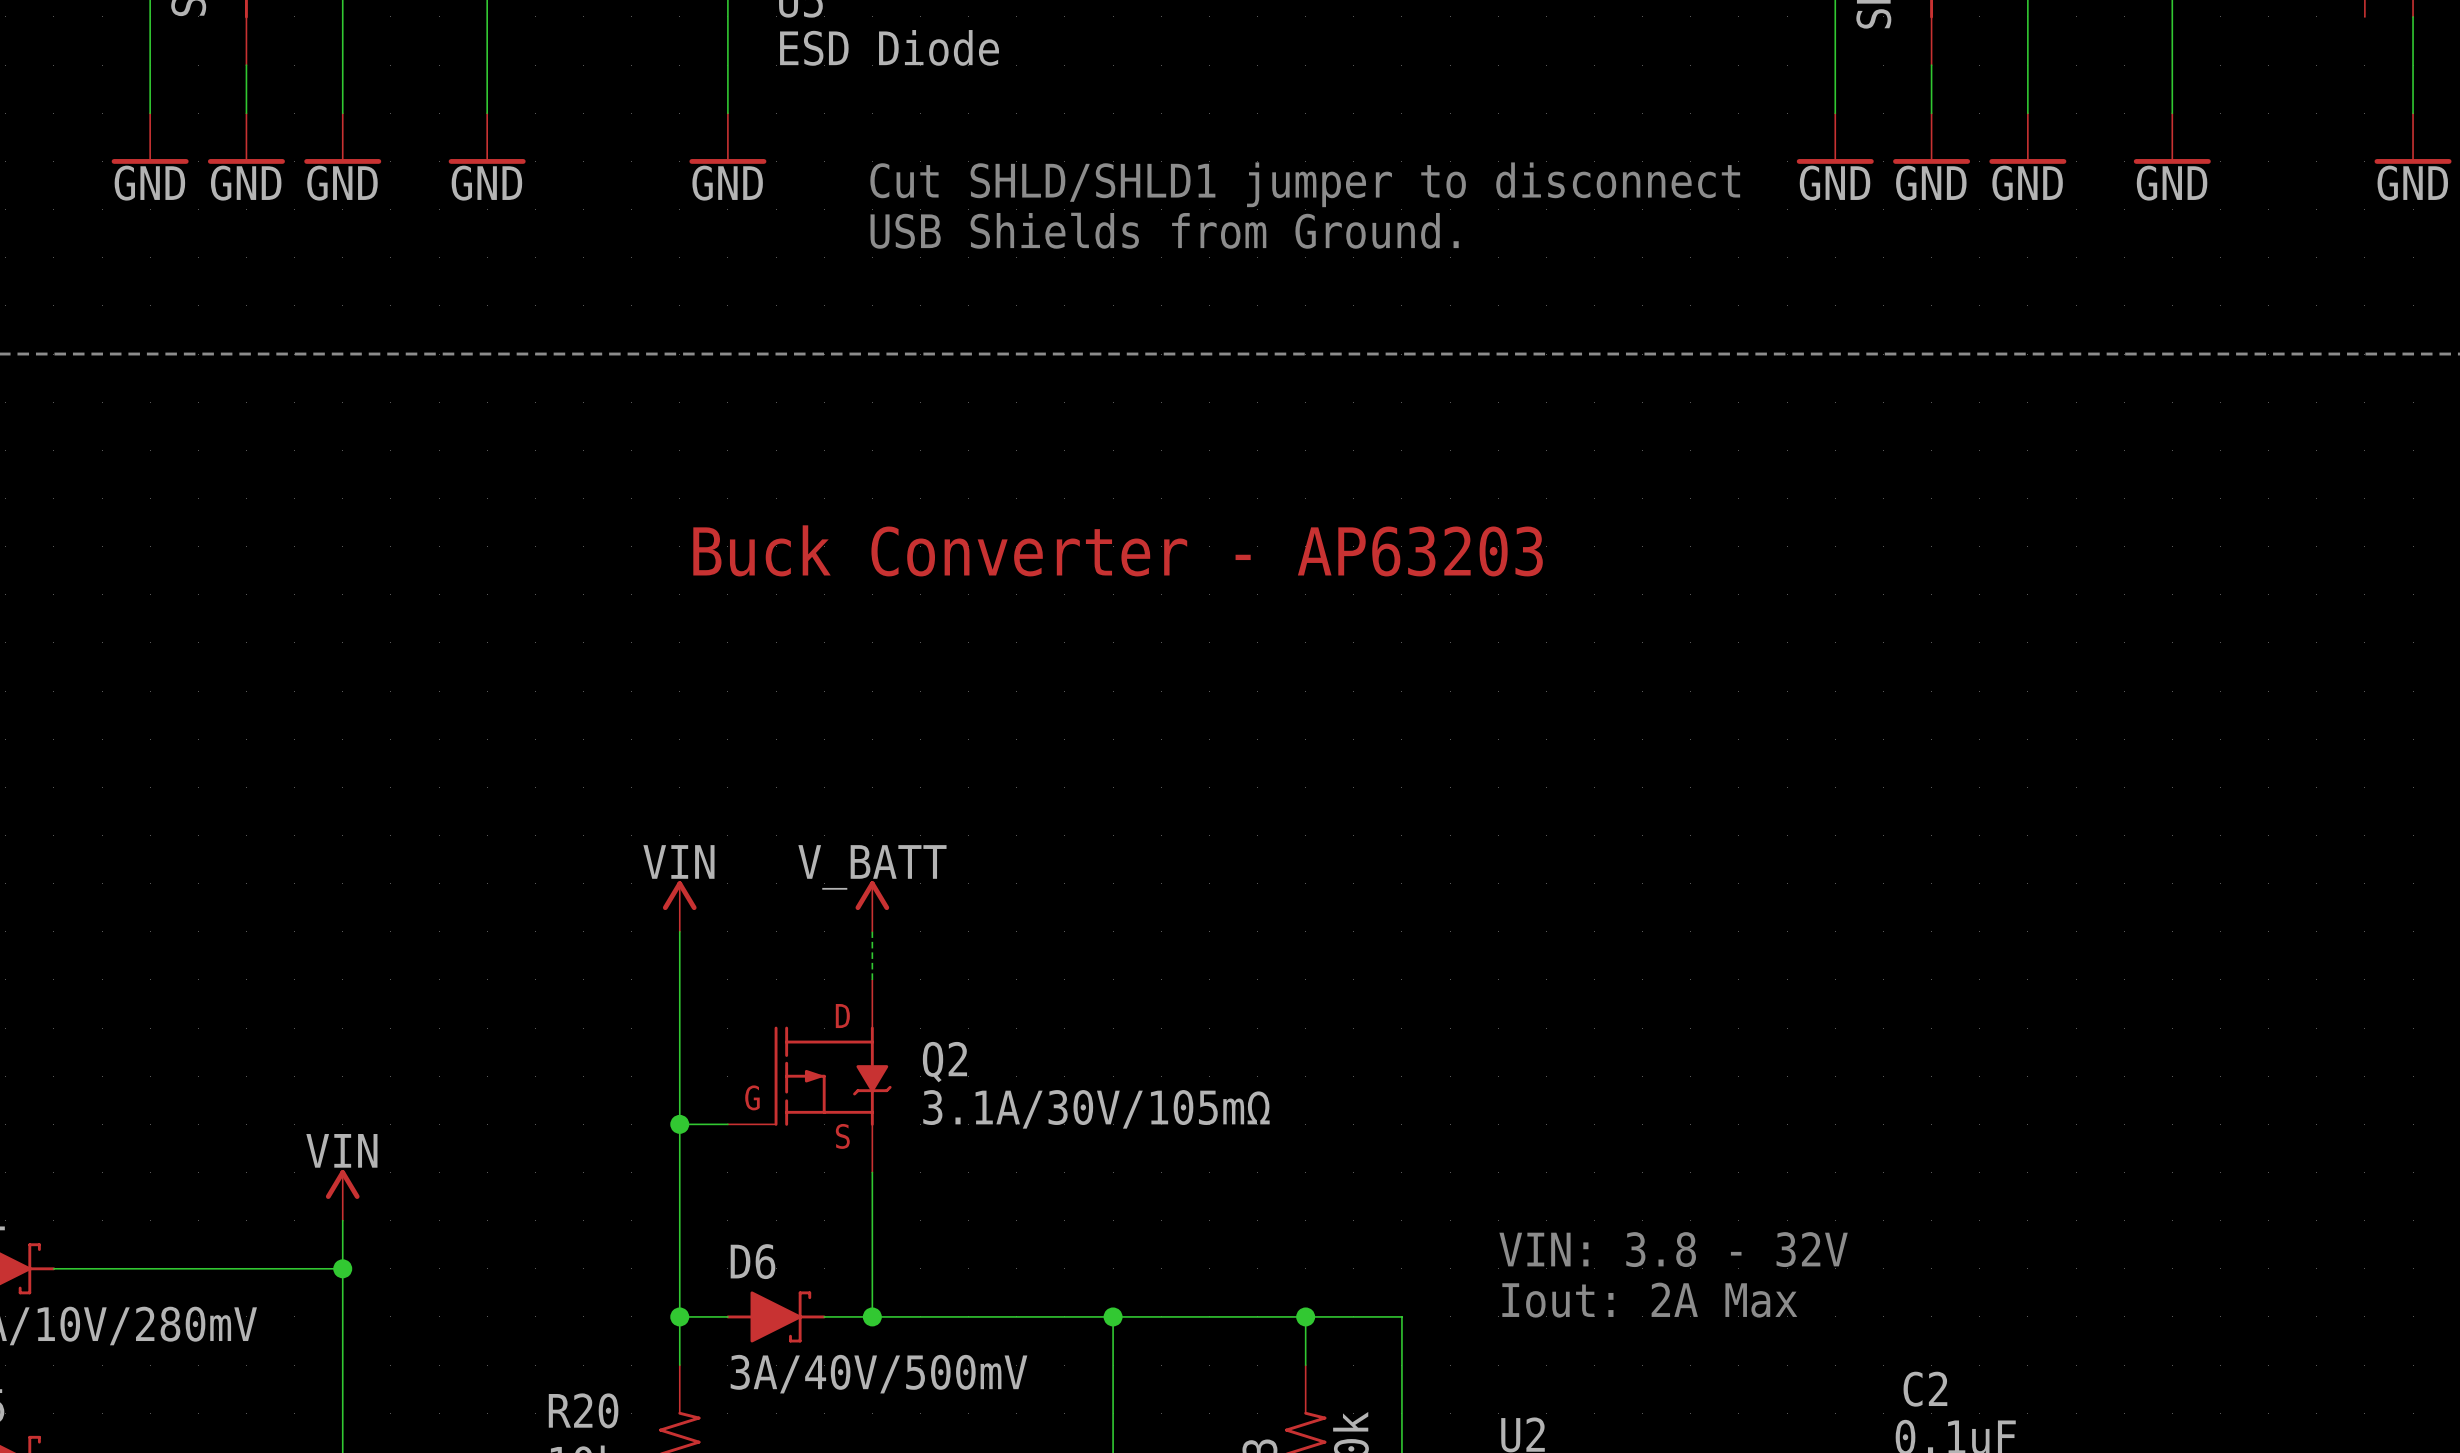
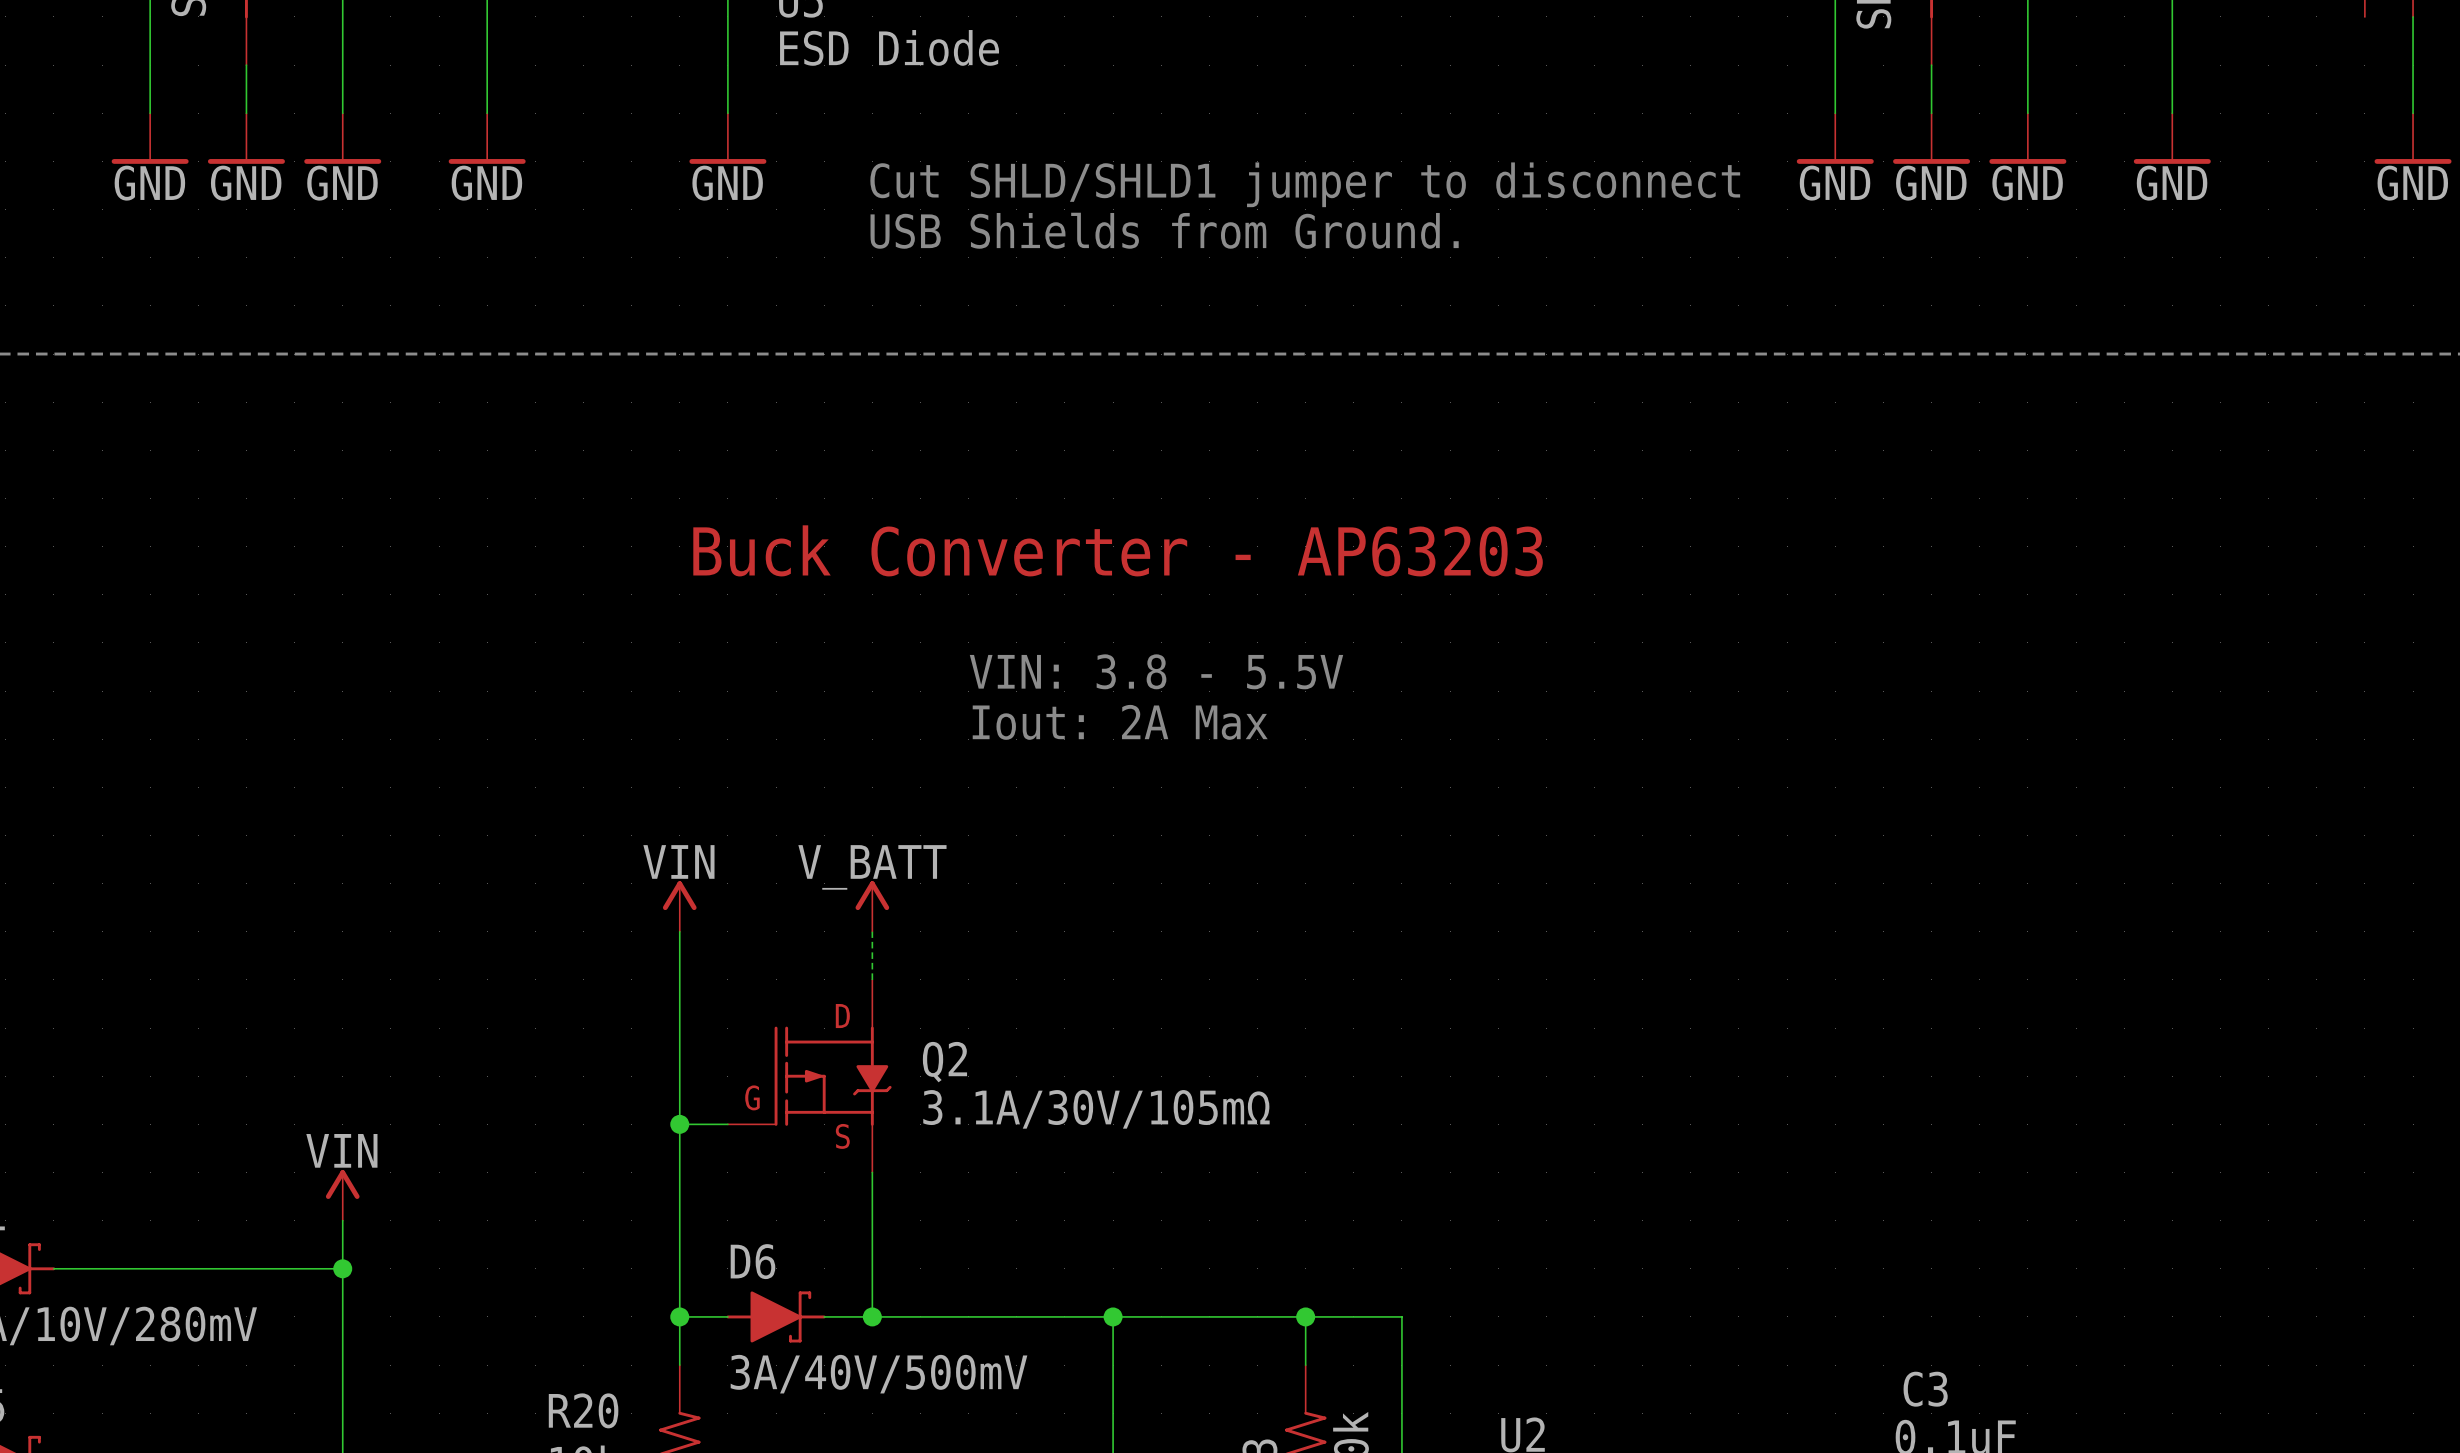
text: none -> VIN: 3.8 - 5.5V (1156, 671)
text: none -> Iout: 2A Max (1120, 722)
text: VIN: 3.8 - 32V (1673, 1249) -> none
text: Iout: 2A Max (1649, 1300) -> none
C2 name: C2 (1925, 1389) -> C3 (1925, 1389)

